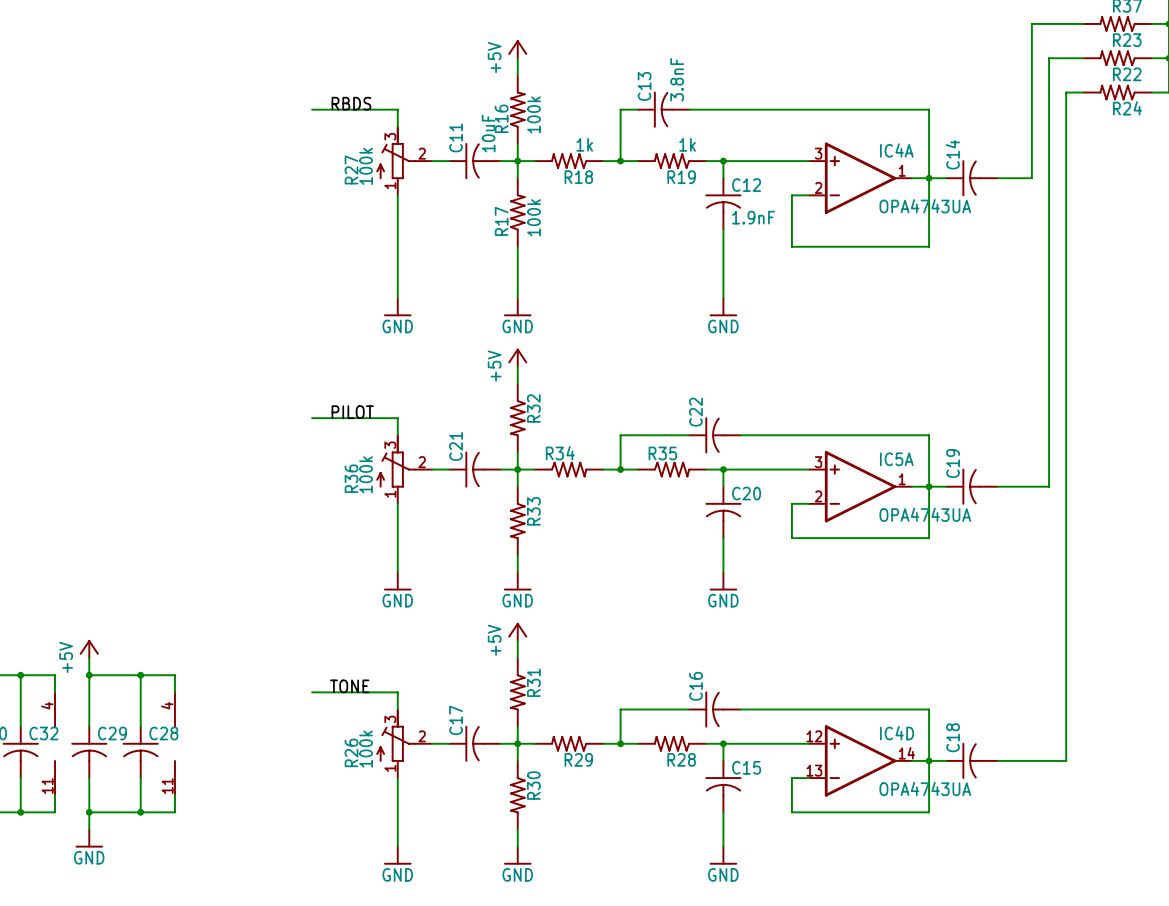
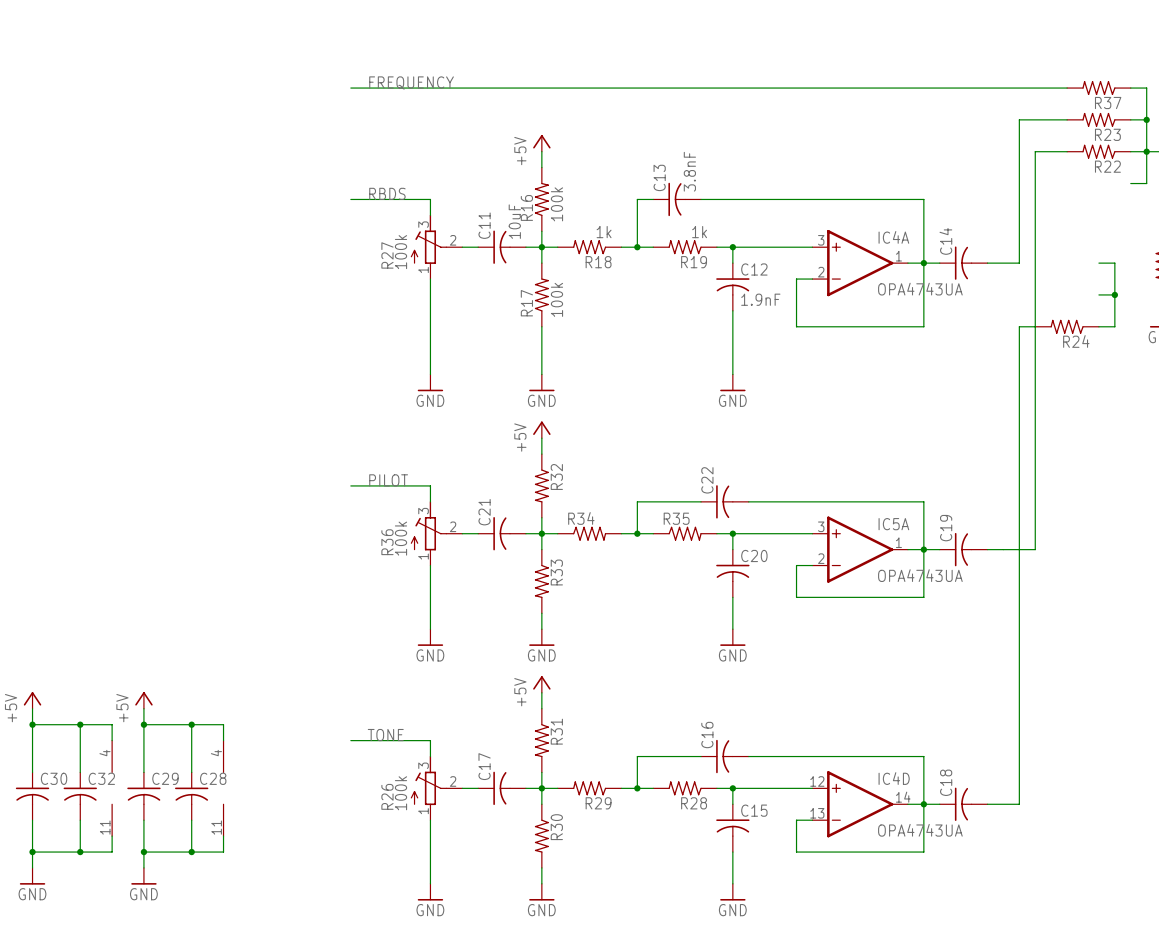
wire: (1083, 92) (1066, 92) (1066, 760) (1031, 760) -> (1035, 326) (1019, 326) (1019, 804)
R24 position: (1117, 92) -> (1067, 326)
wire: none -> (1098, 263) (1114, 263) (1114, 326) (1098, 326)
wire: none -> (1098, 294) (1114, 294)
junction: none -> (1114, 294)

